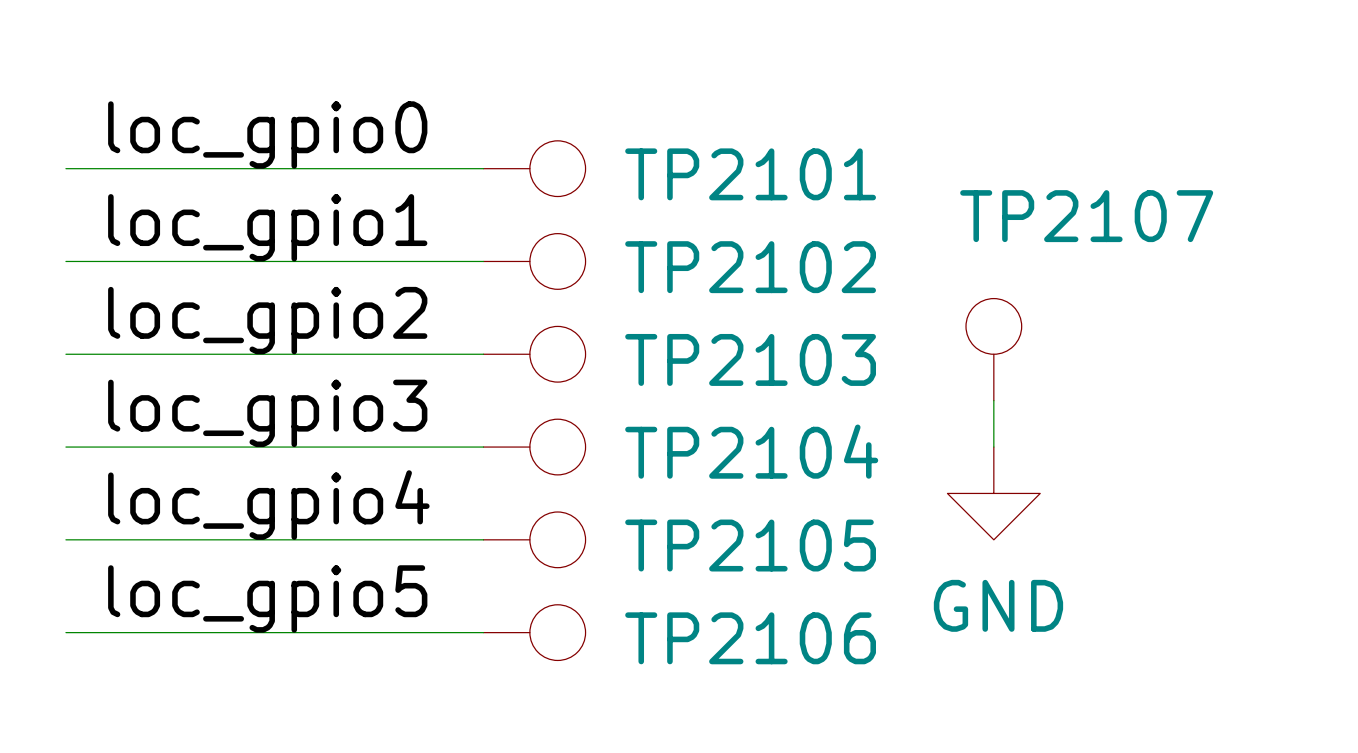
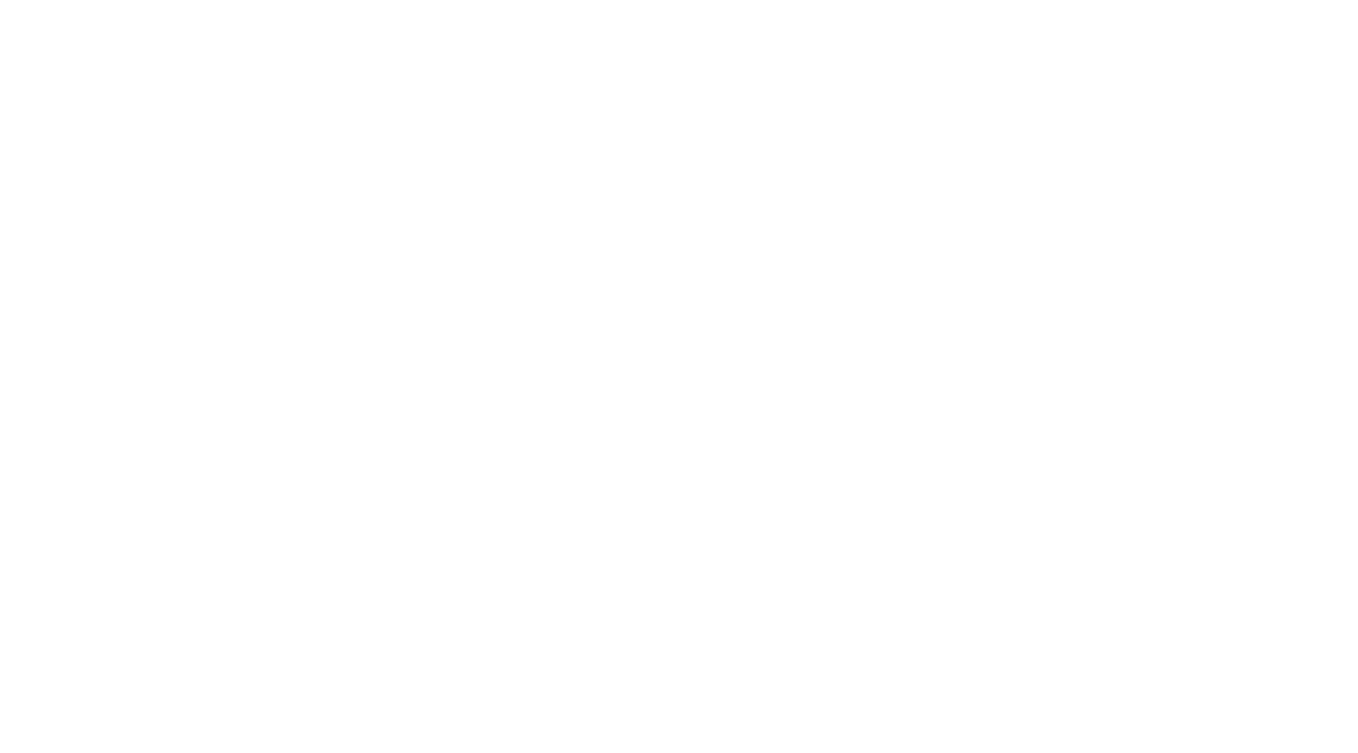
label: loc_gpio0 (267, 135) -> none
wire: (65, 168) (483, 168) -> none
TP2101: (534, 168) -> none
label: loc_gpio1 (267, 227) -> none
wire: (65, 261) (483, 261) -> none
TP2102: (534, 261) -> none
label: loc_gpio2 (267, 320) -> none
TP2107: (993, 349) -> none
wire: (65, 354) (483, 354) -> none
TP2103: (534, 354) -> none
wire: (993, 400) (993, 447) -> none
label: loc_gpio3 (267, 413) -> none
wire: (65, 447) (483, 447) -> none
TP2104: (534, 447) -> none
power symbol: GND (993, 493) -> none
label: loc_gpio4 (268, 505) -> none
wire: (65, 539) (483, 539) -> none
TP2105: (534, 539) -> none
label: loc_gpio5 (267, 598) -> none
wire: (65, 632) (483, 632) -> none
TP2106: (534, 632) -> none

